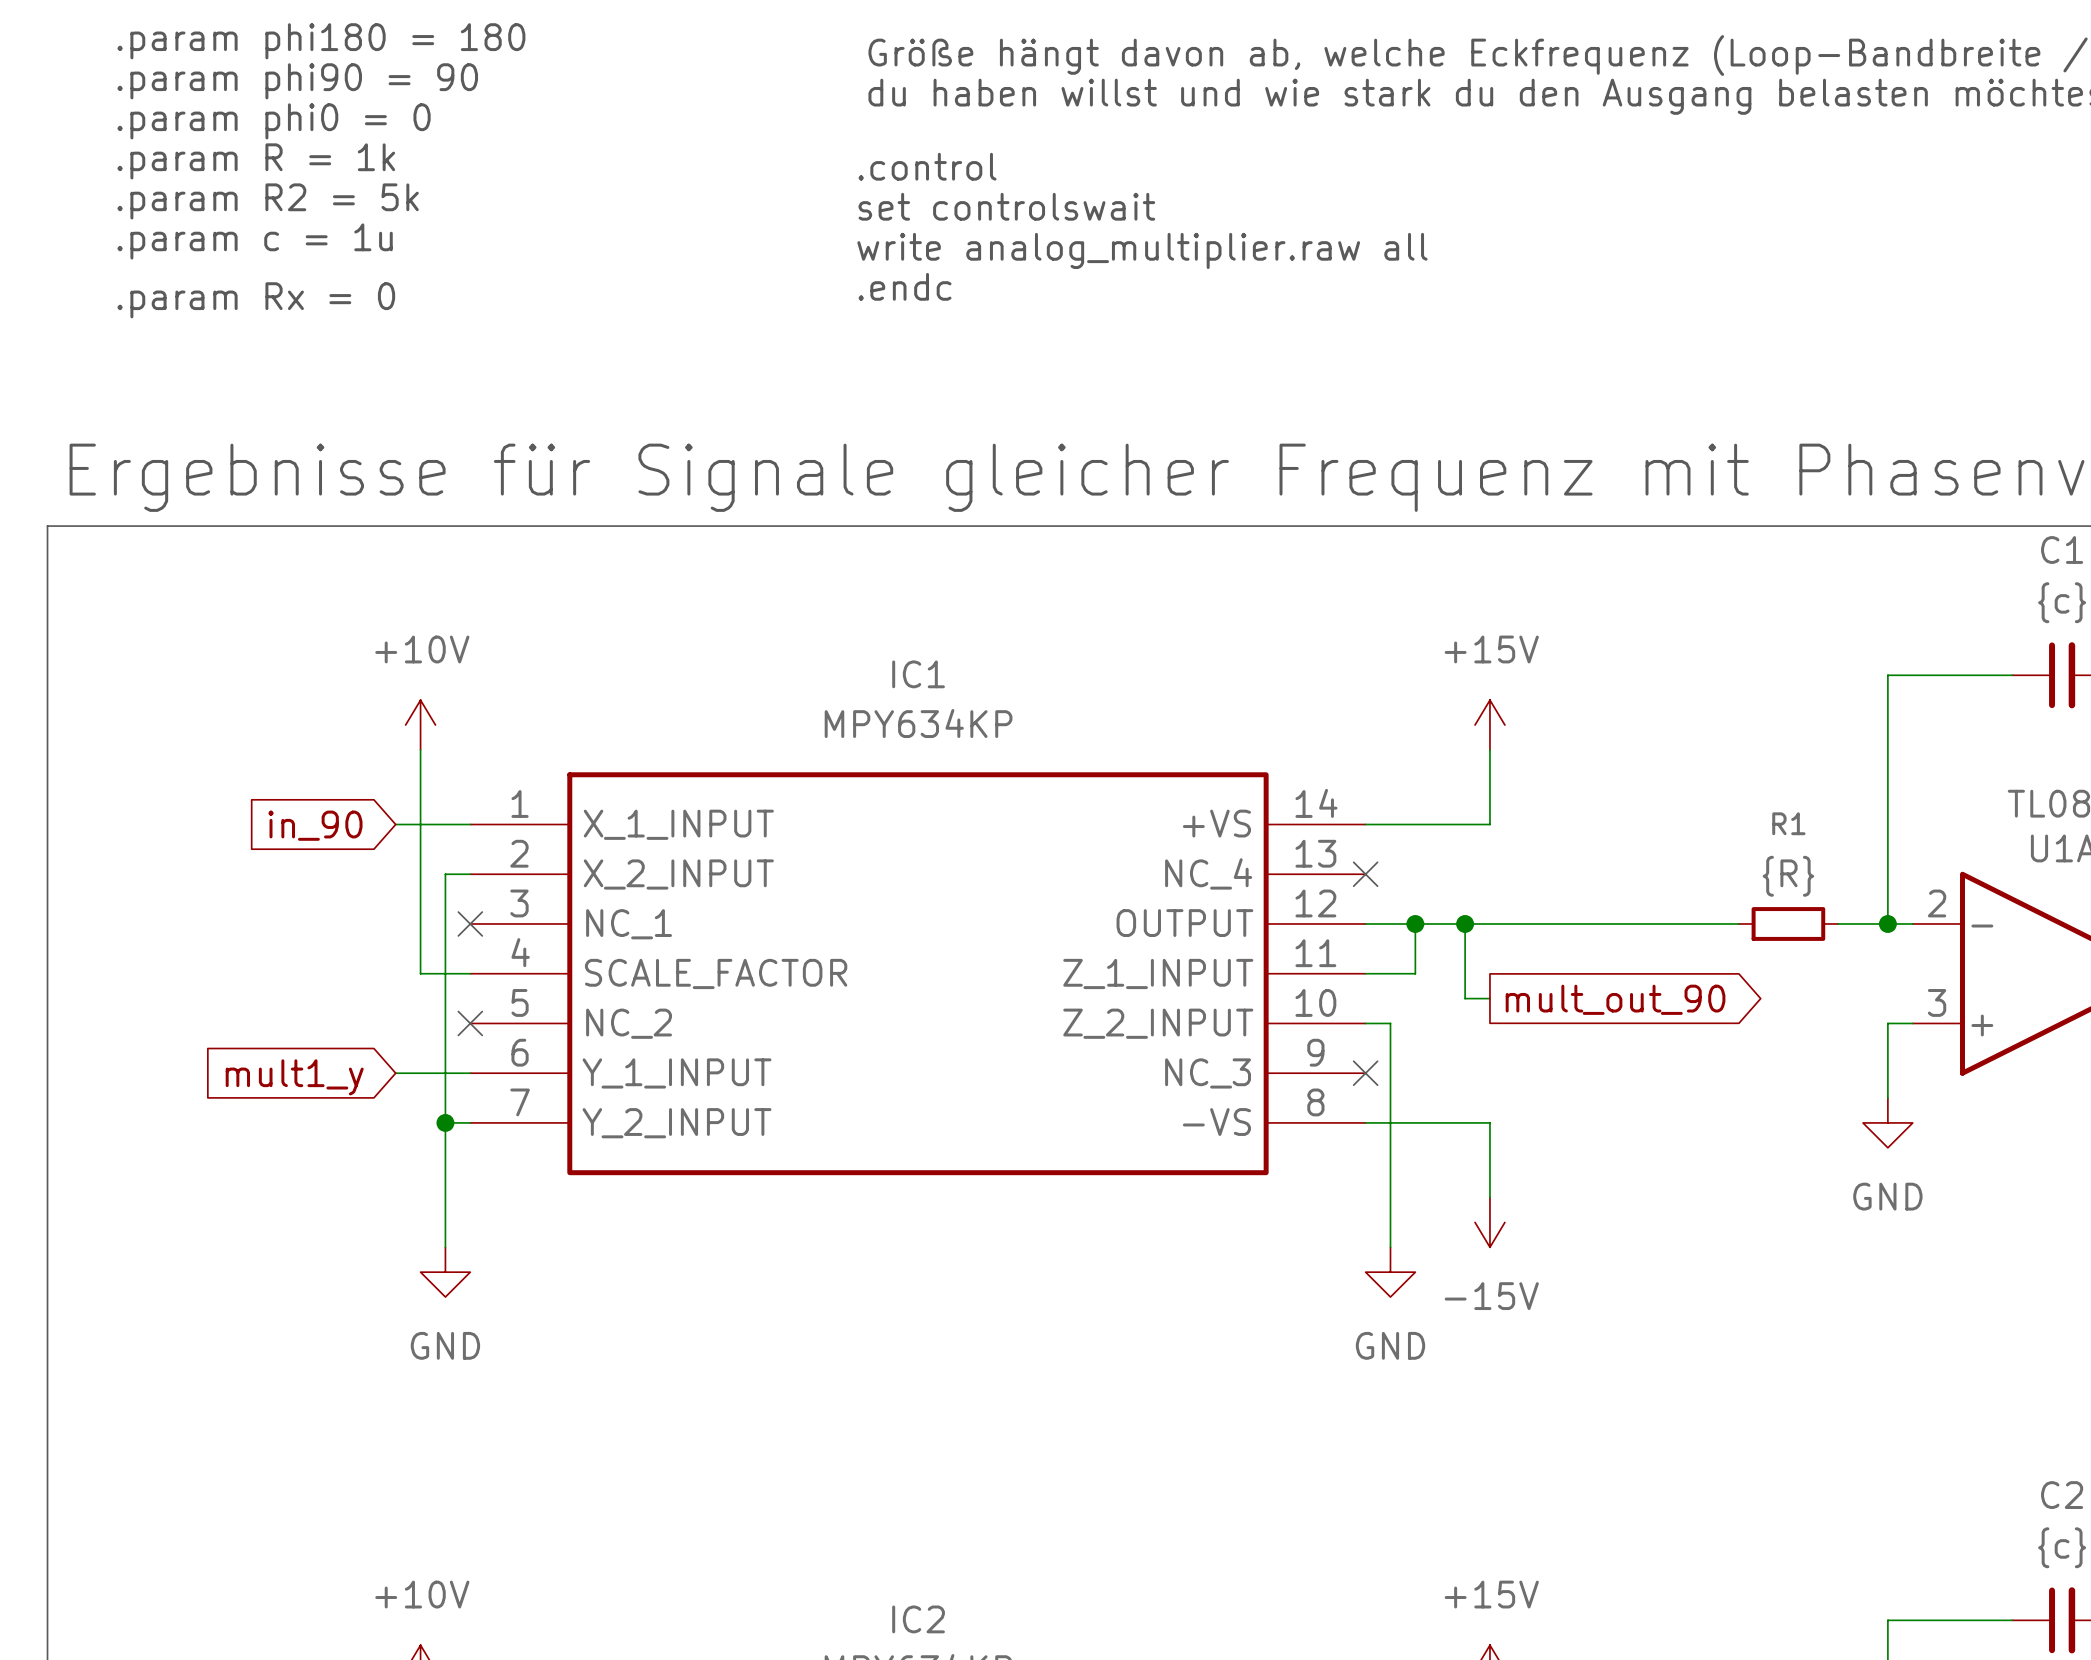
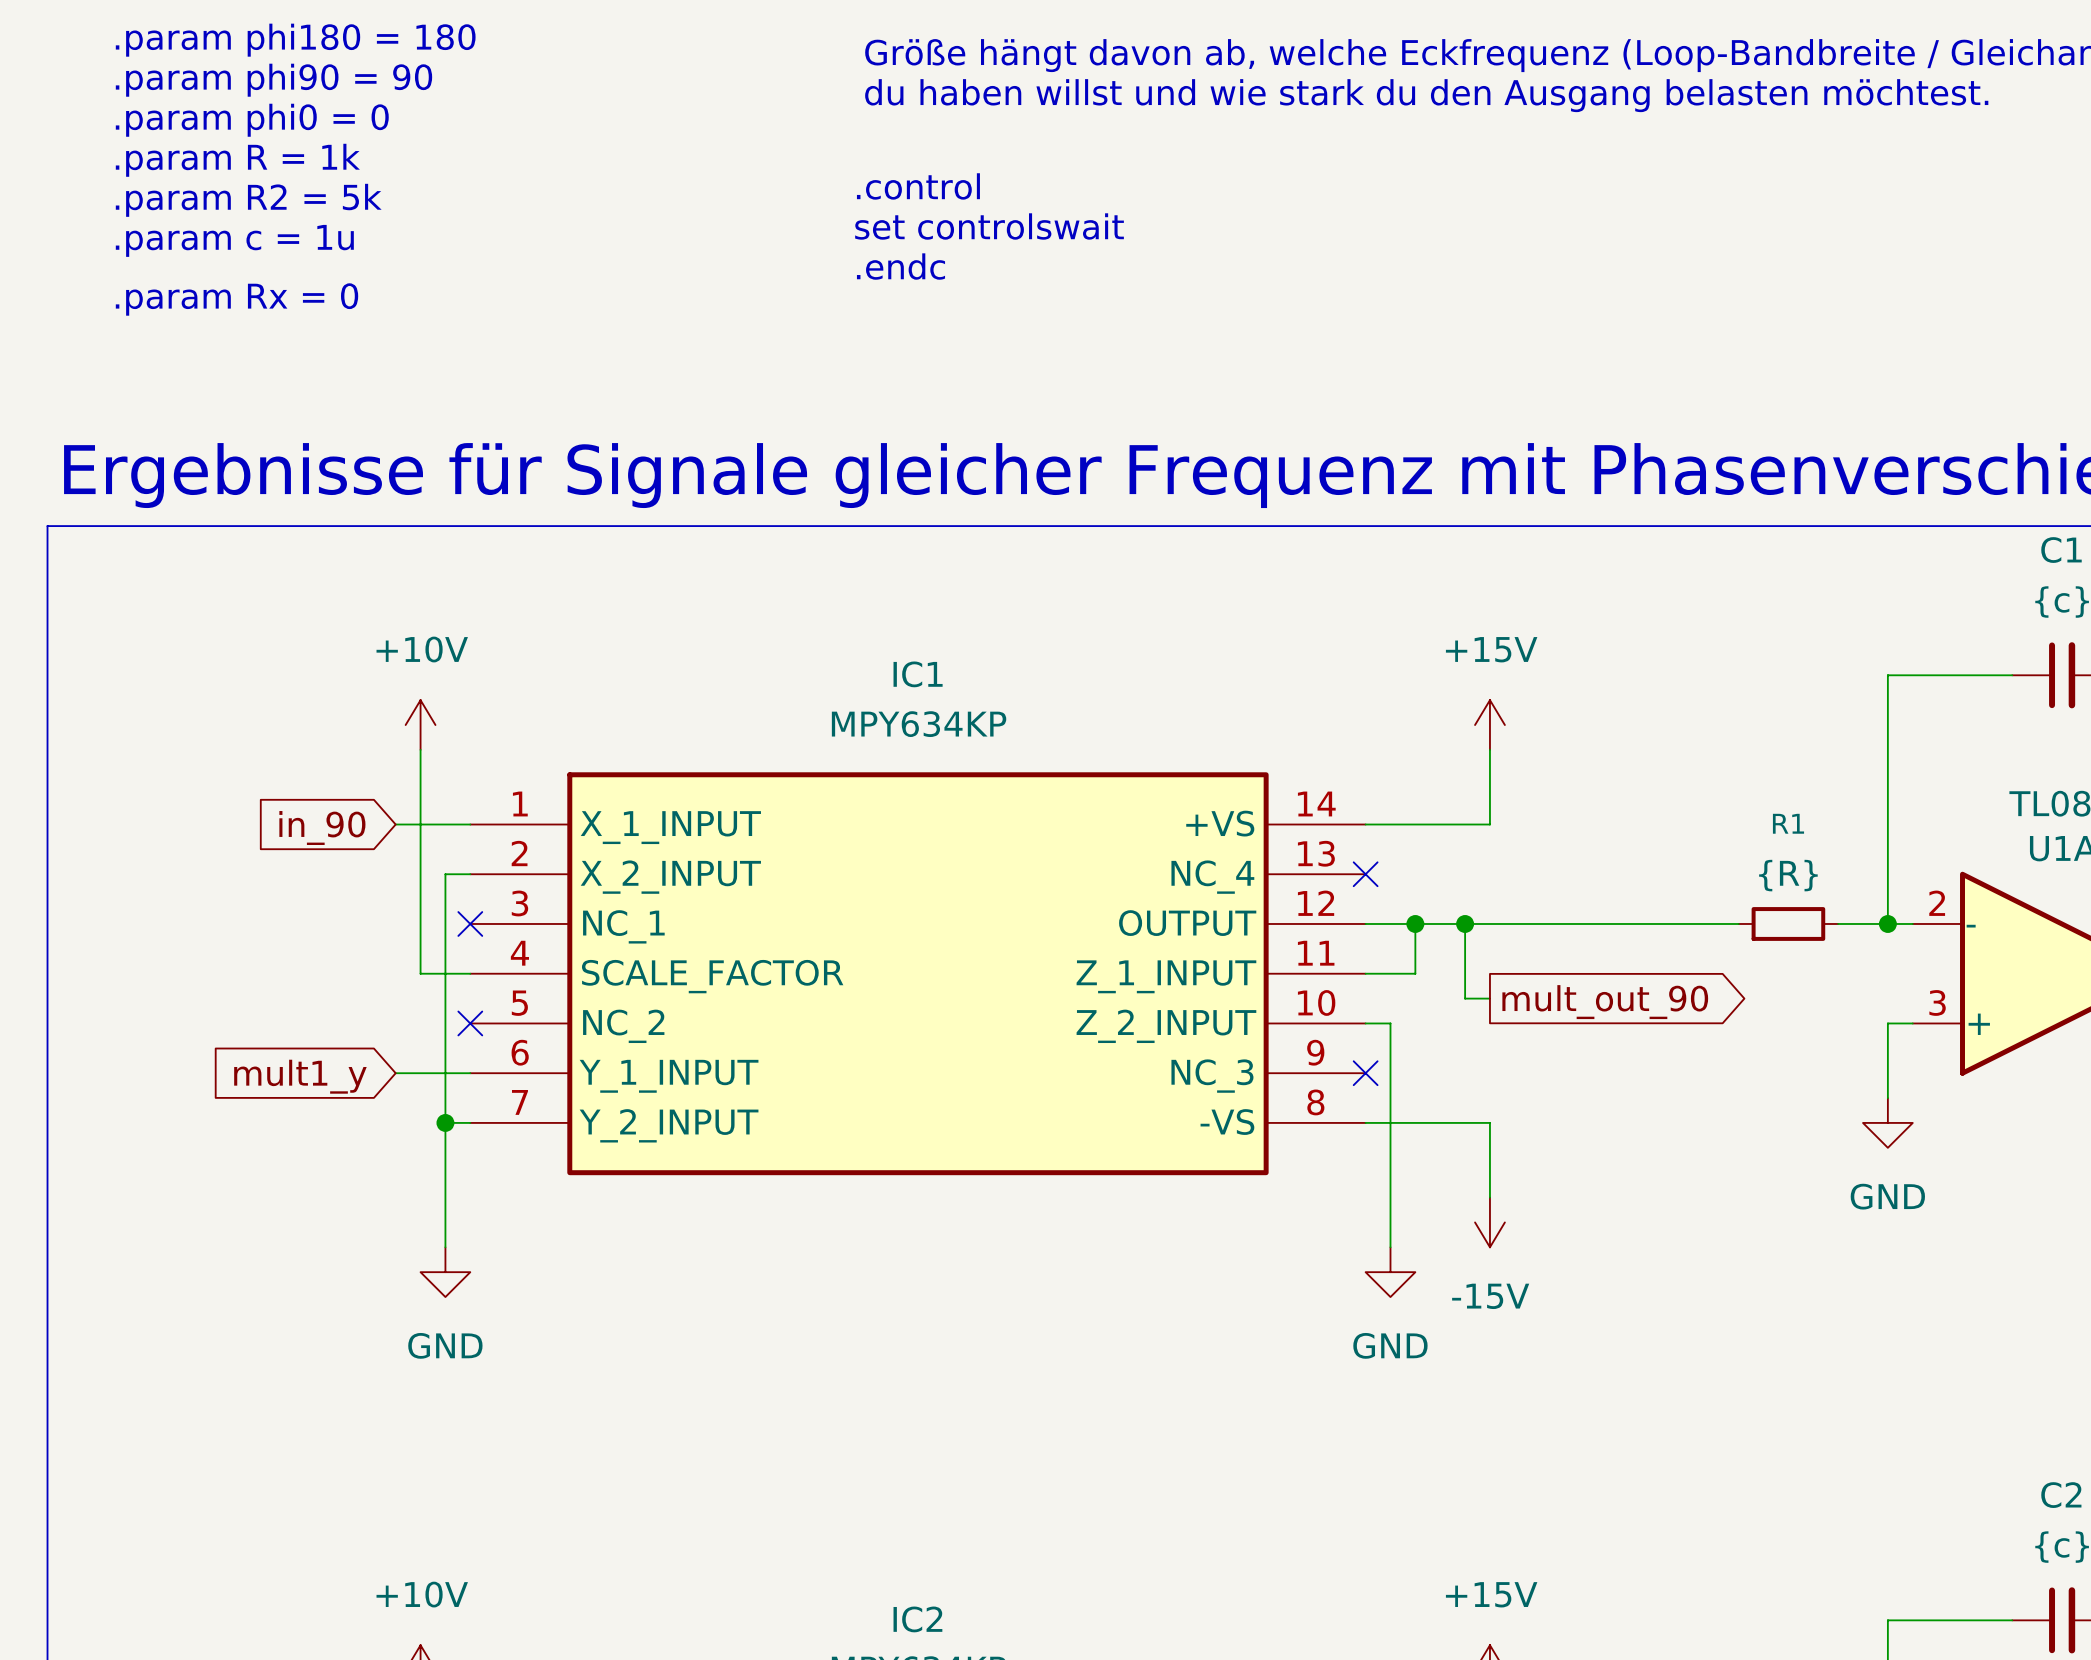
text position: .control (927, 166) -> .control (918, 186)
text position: set controlswait (1006, 206) -> set controlswait (989, 226)
text: write analog_multiplier.raw all (1142, 250) -> none
text position: .endc (905, 286) -> .endc (900, 266)

